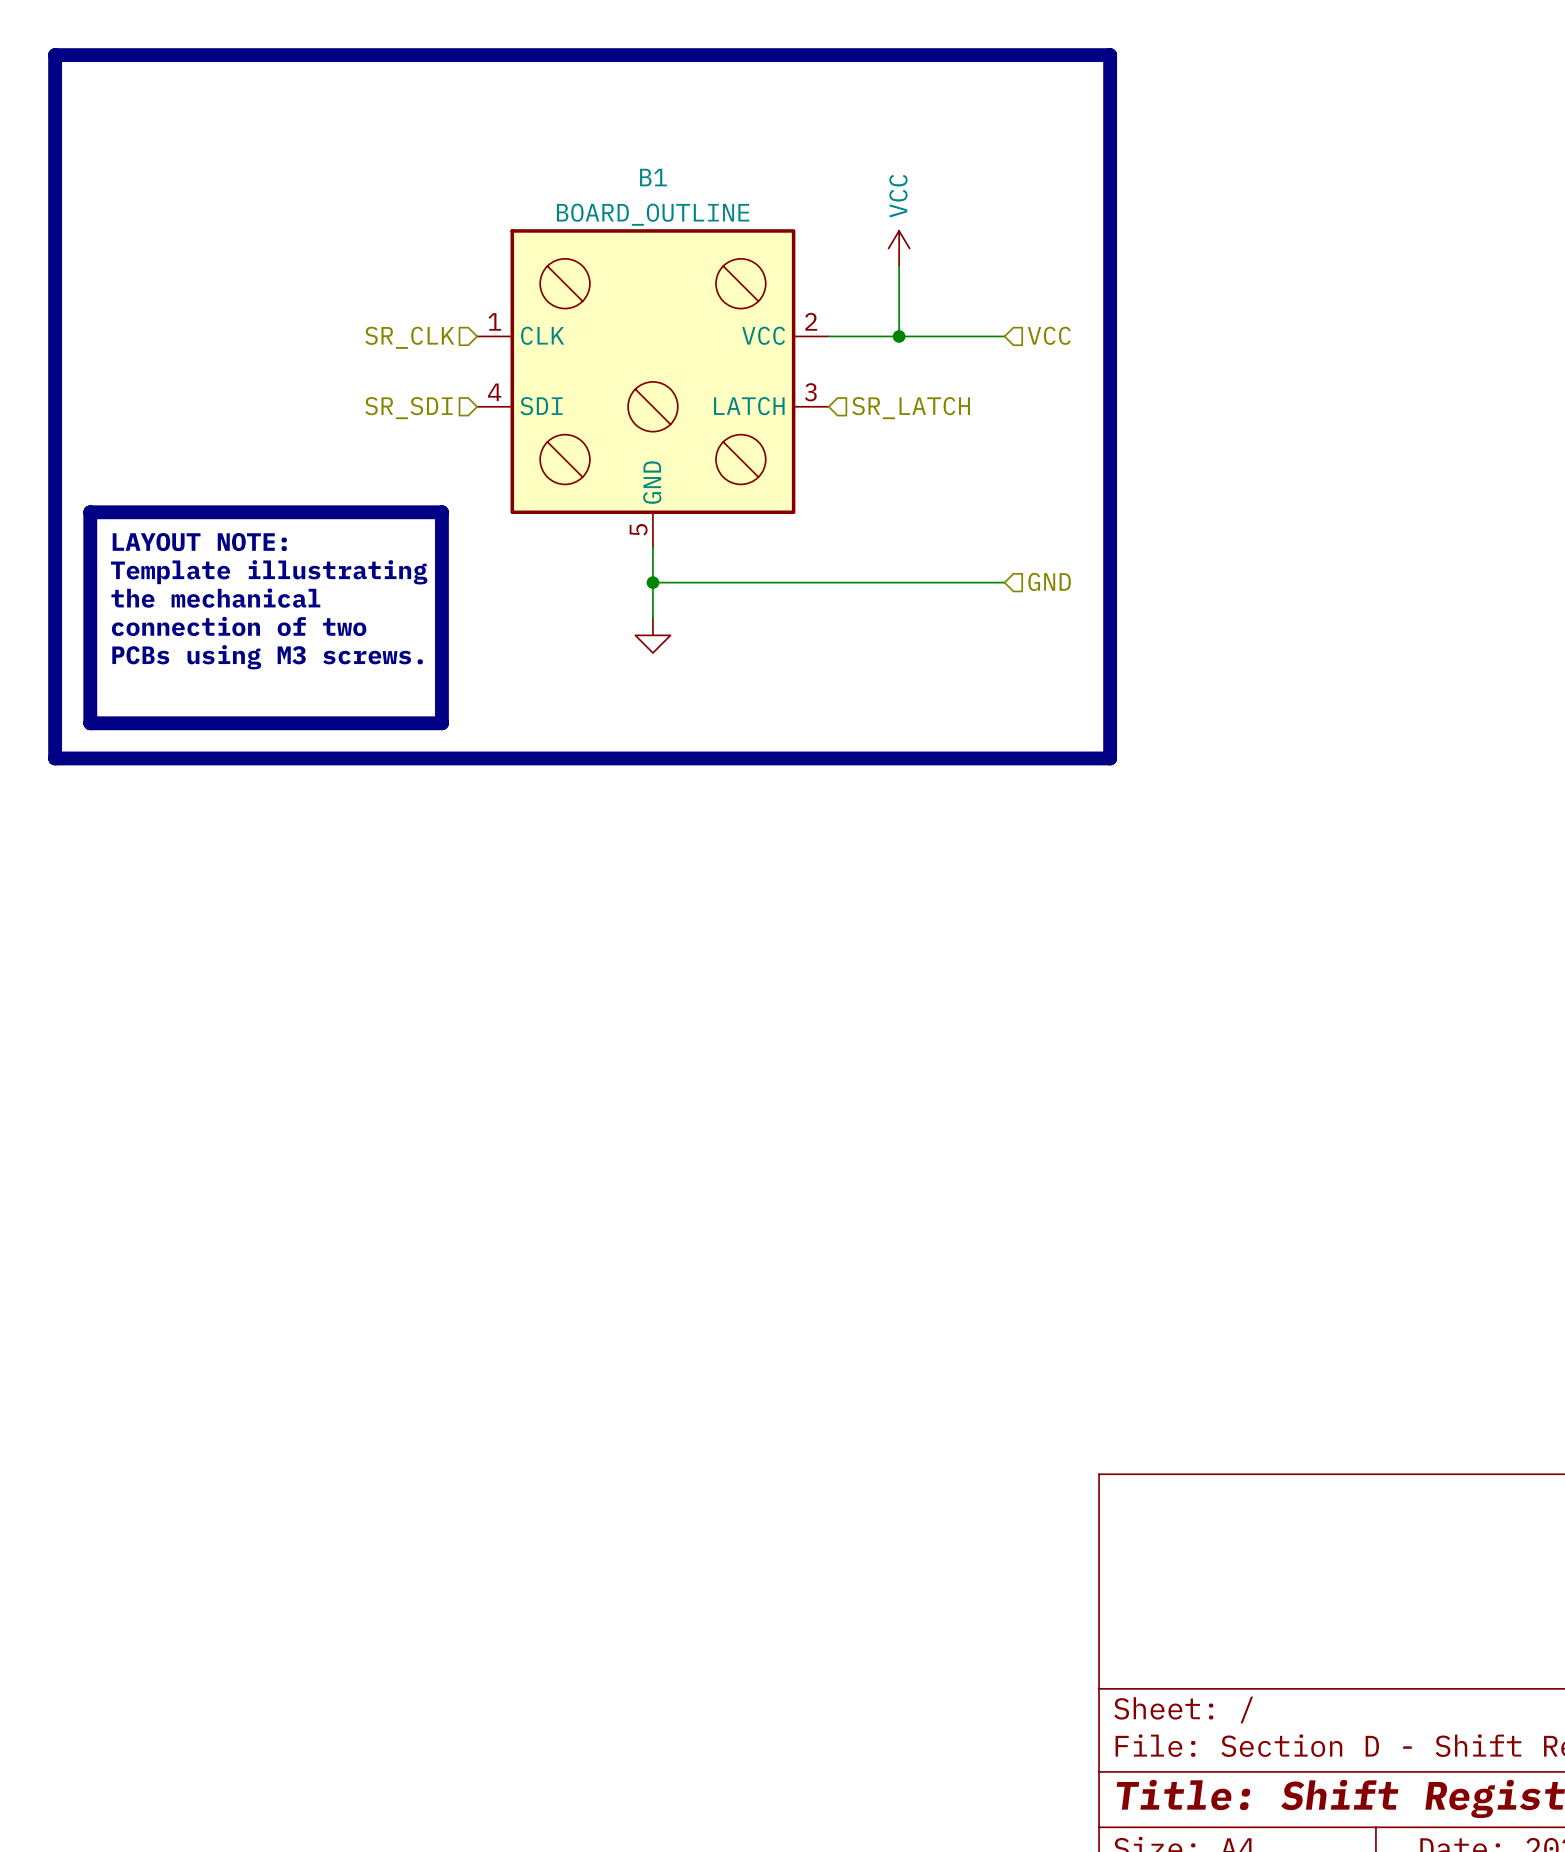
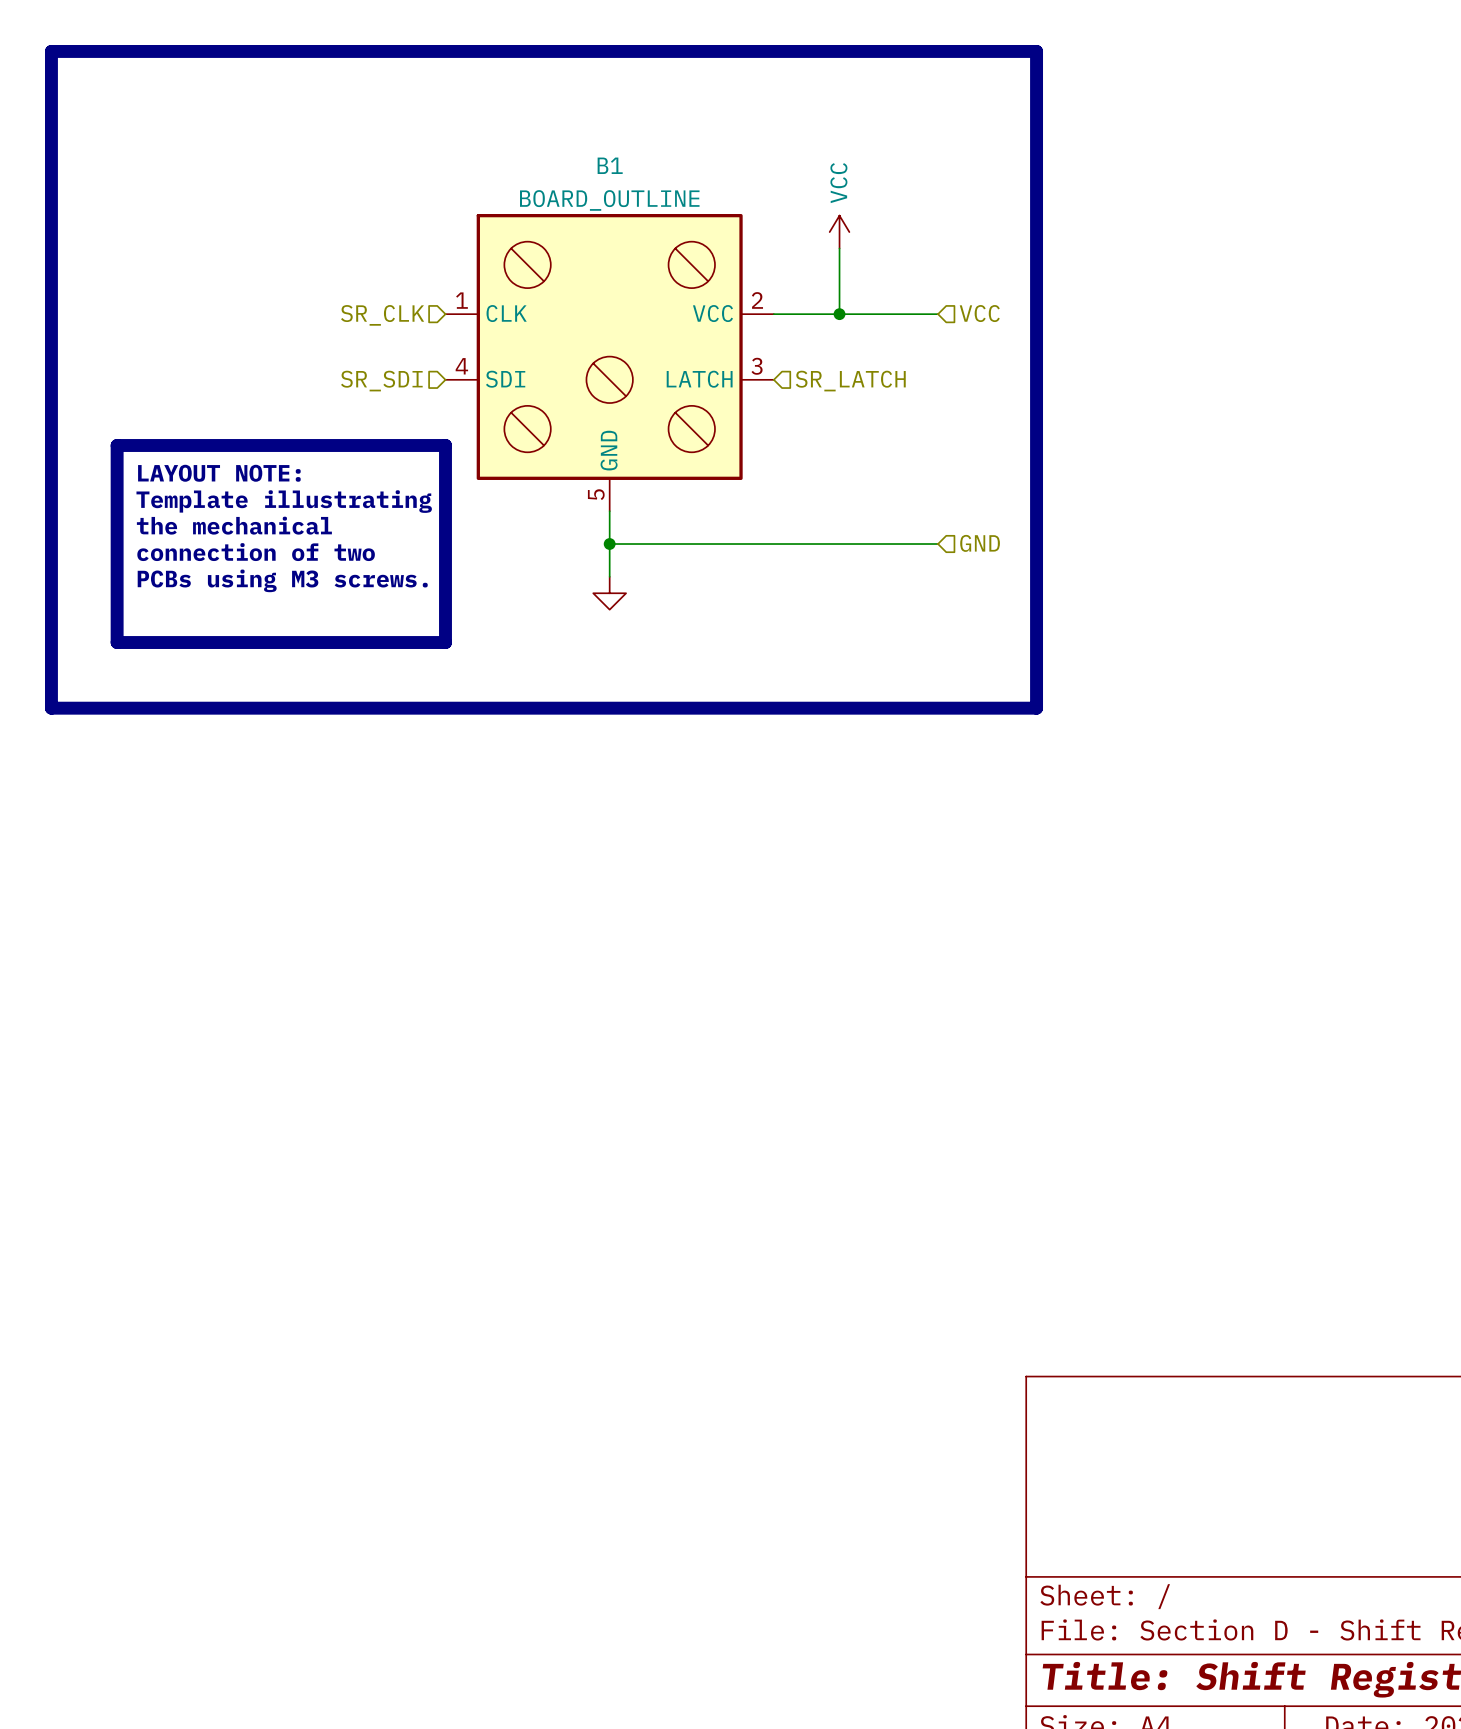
line: (90, 512) (441, 512) (441, 723) (90, 723) (90, 512) -> (117, 445) (445, 445) (445, 642) (117, 642) (117, 445)
text position: LAYOUT NOTE: (199, 542) -> LAYOUT NOTE: (219, 473)
text position: Template illustrating (269, 572) -> Template illustrating (284, 501)
text position: the mechanical (215, 598) -> the mechanical (234, 525)
text position: connection of two (239, 626) -> connection of two (256, 552)
text position: PCBs using M3 screws. (267, 657) -> PCBs using M3 screws. (282, 580)

